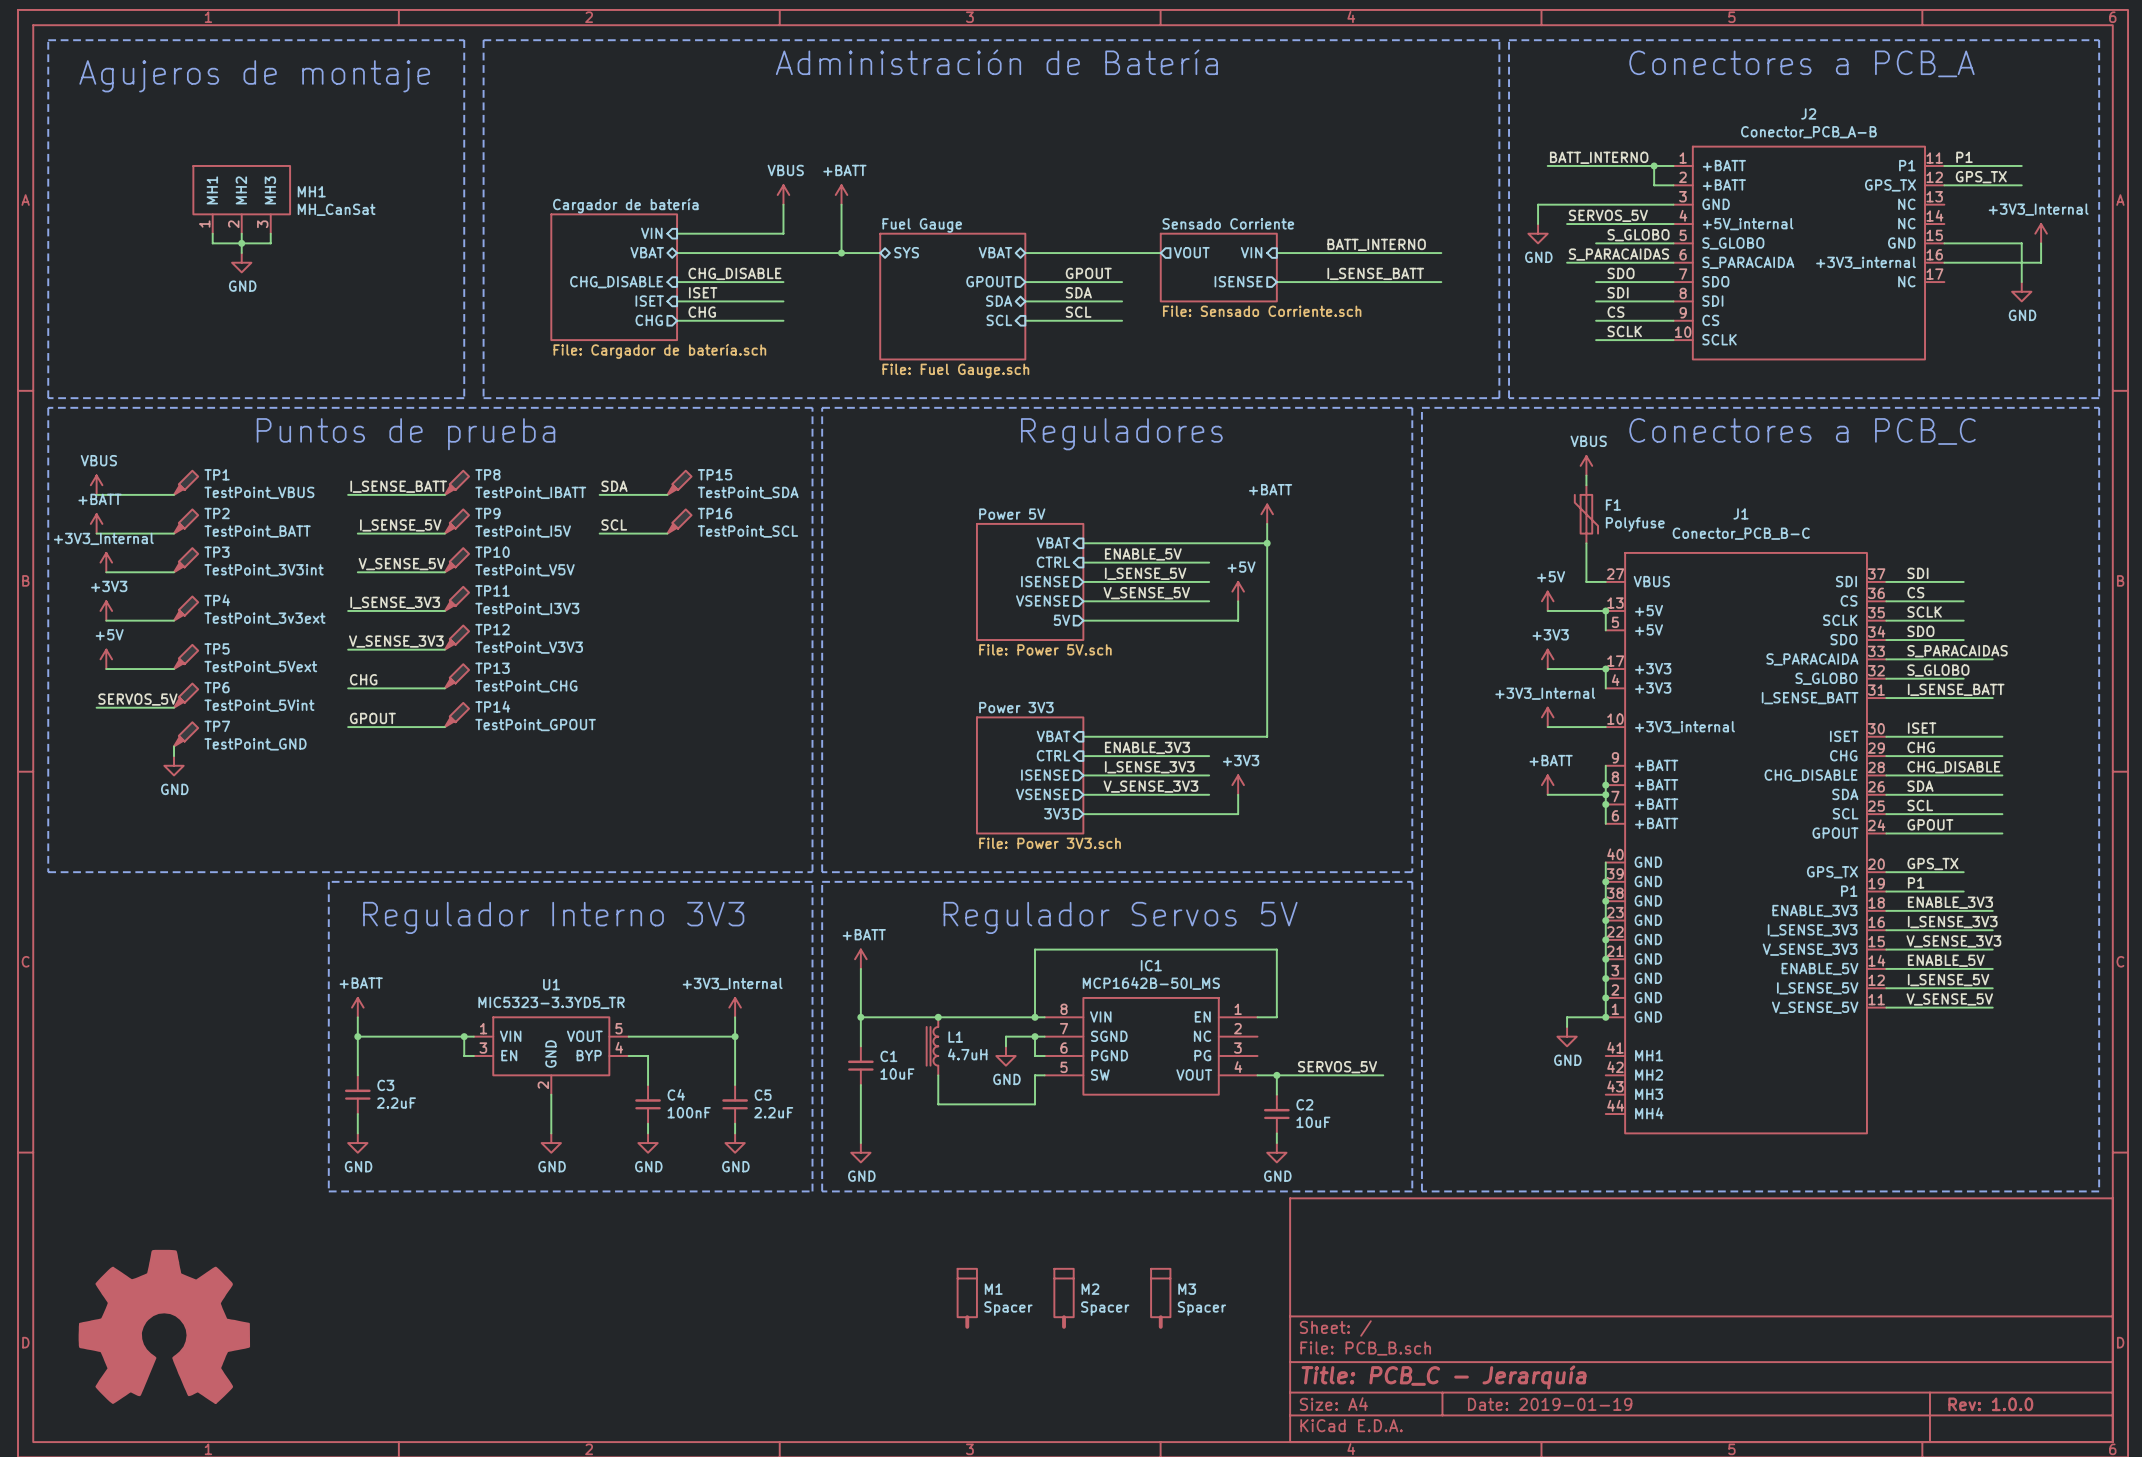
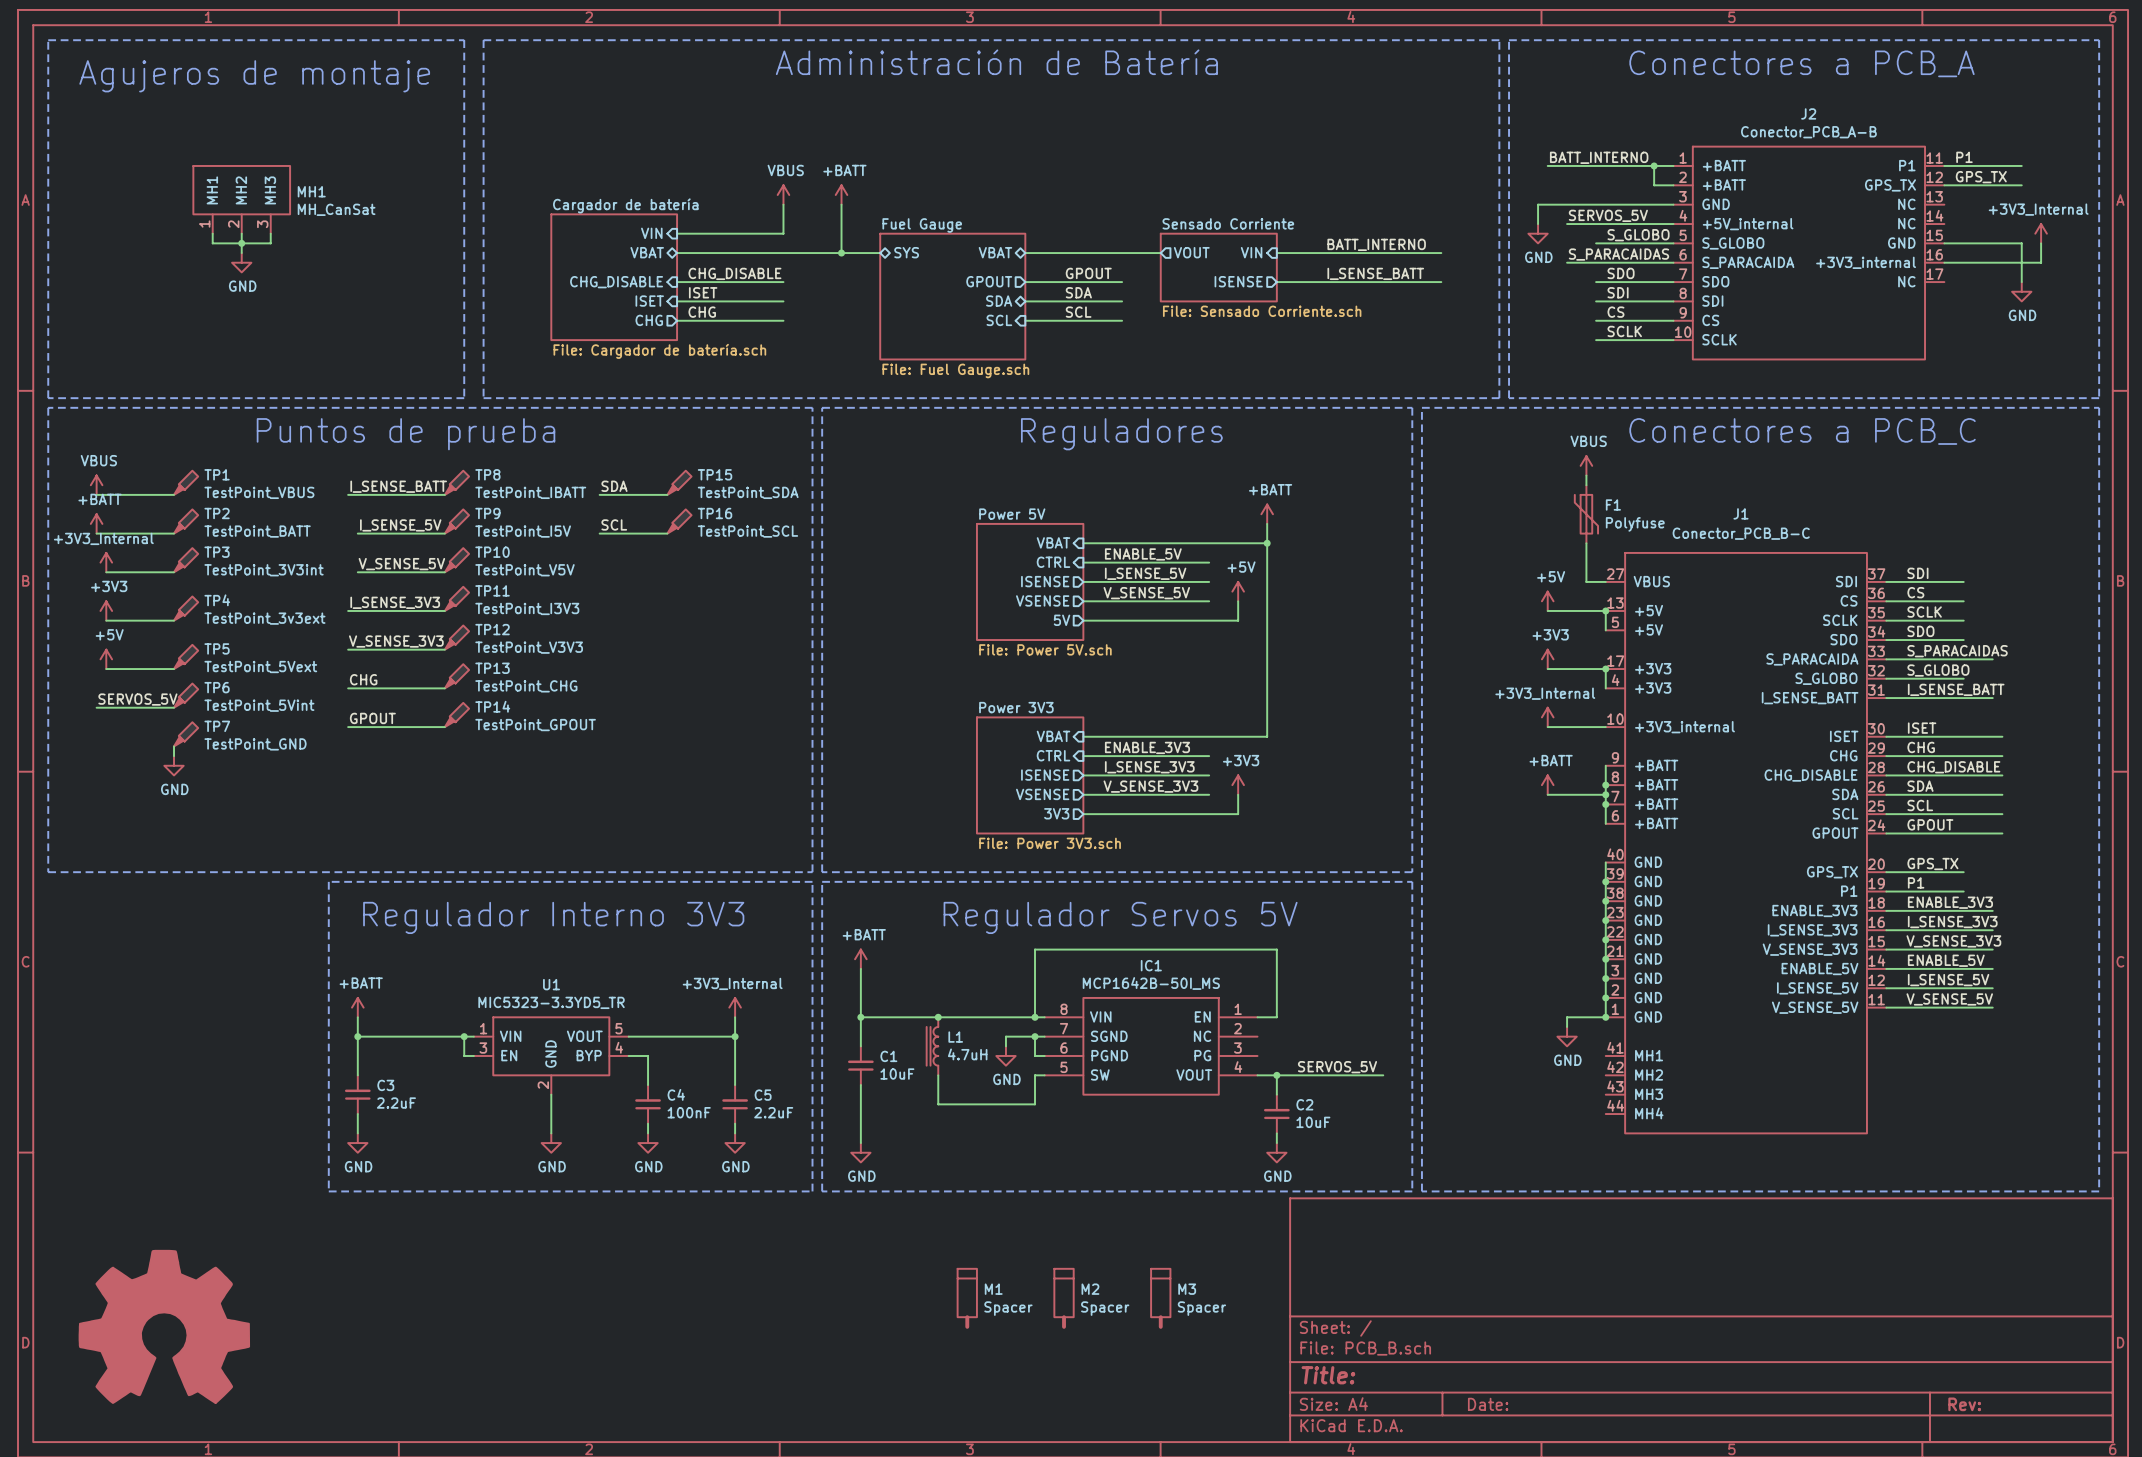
title block: Title: PCB_C - Jerarquía (1444, 1377) -> Title: (1328, 1375)
title block: Date: 2019-01-19 (1550, 1404) -> Date: (1488, 1404)
title block: Rev: 1.0.0 (1990, 1404) -> Rev: (1964, 1404)

